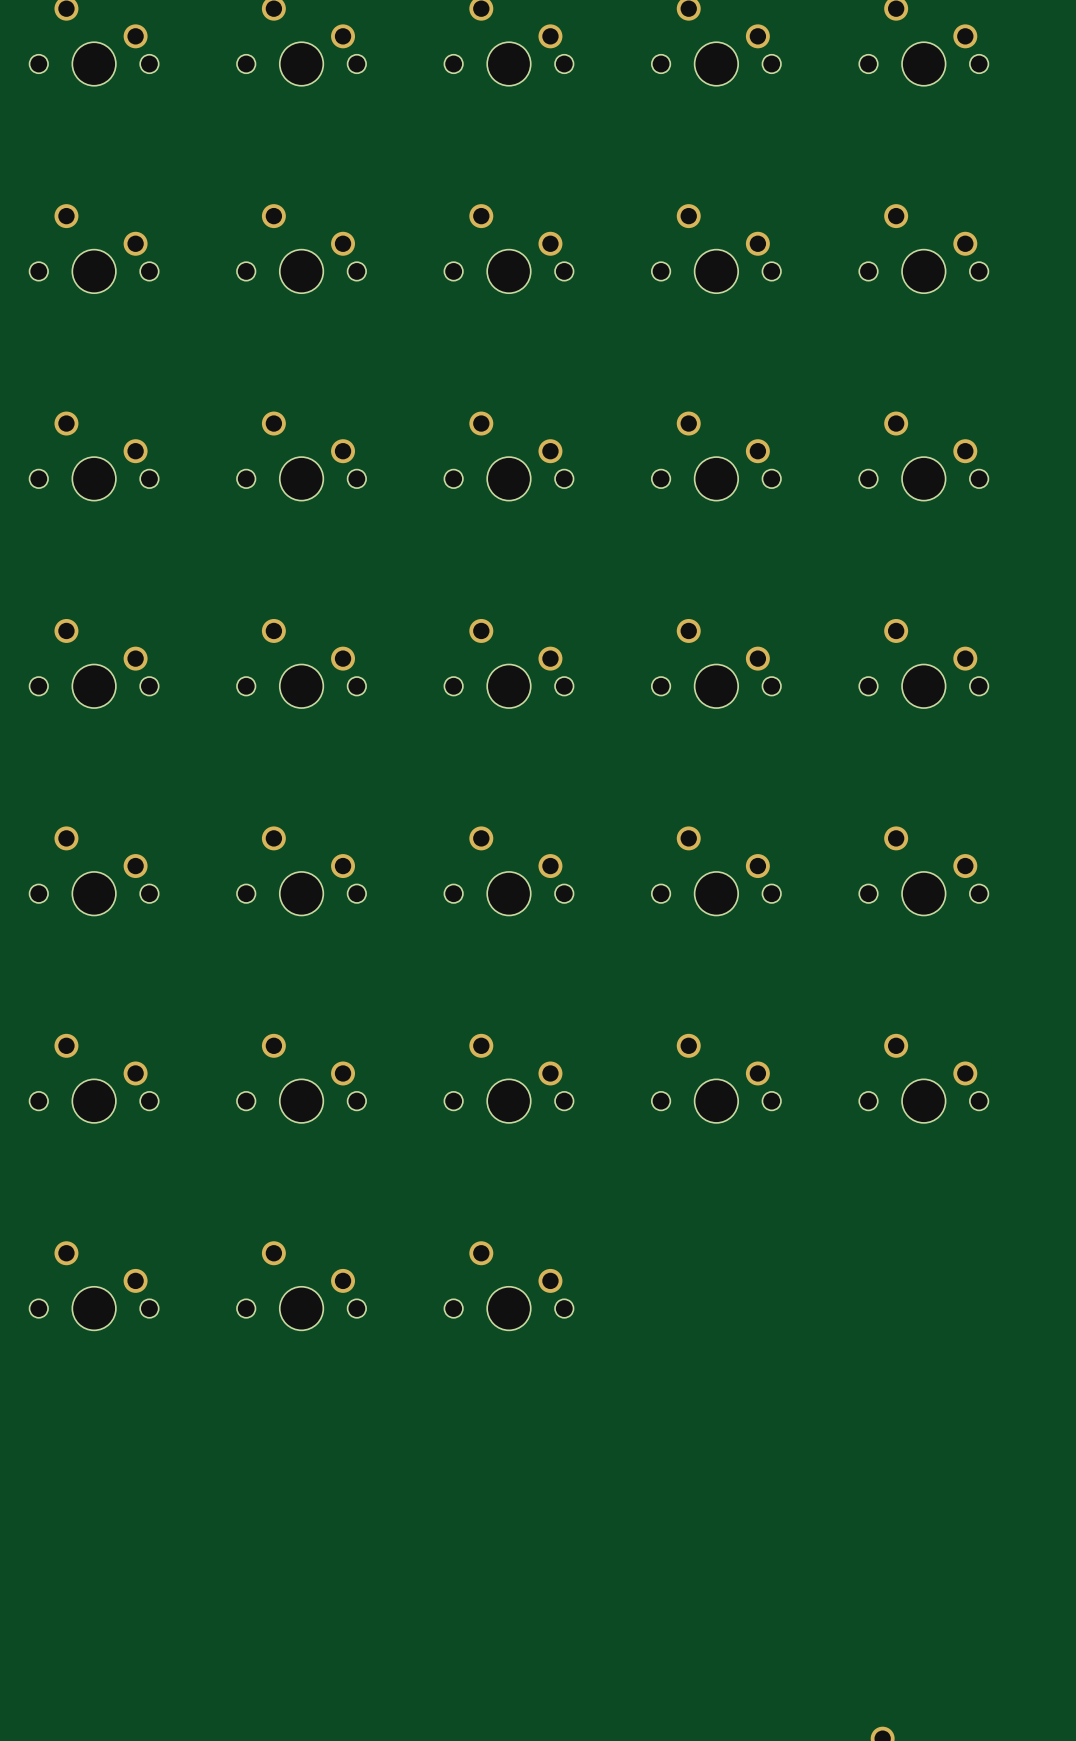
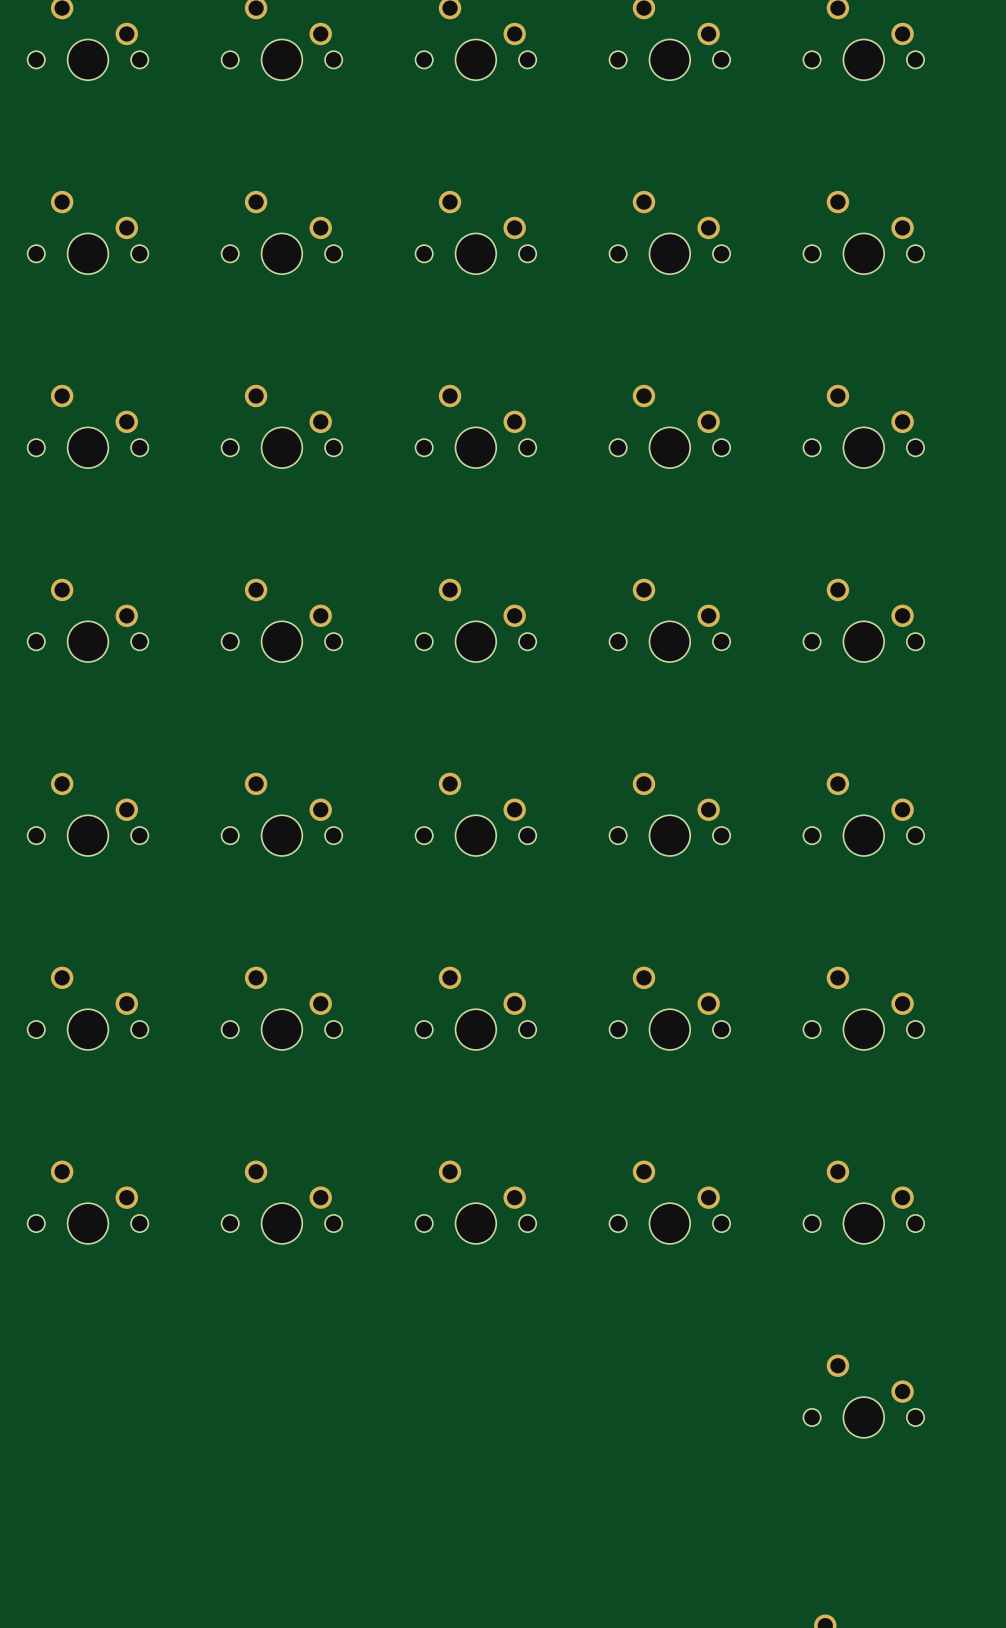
part: none -> (669, 1202)
part: none -> (863, 1202)
part: none -> (863, 1396)

